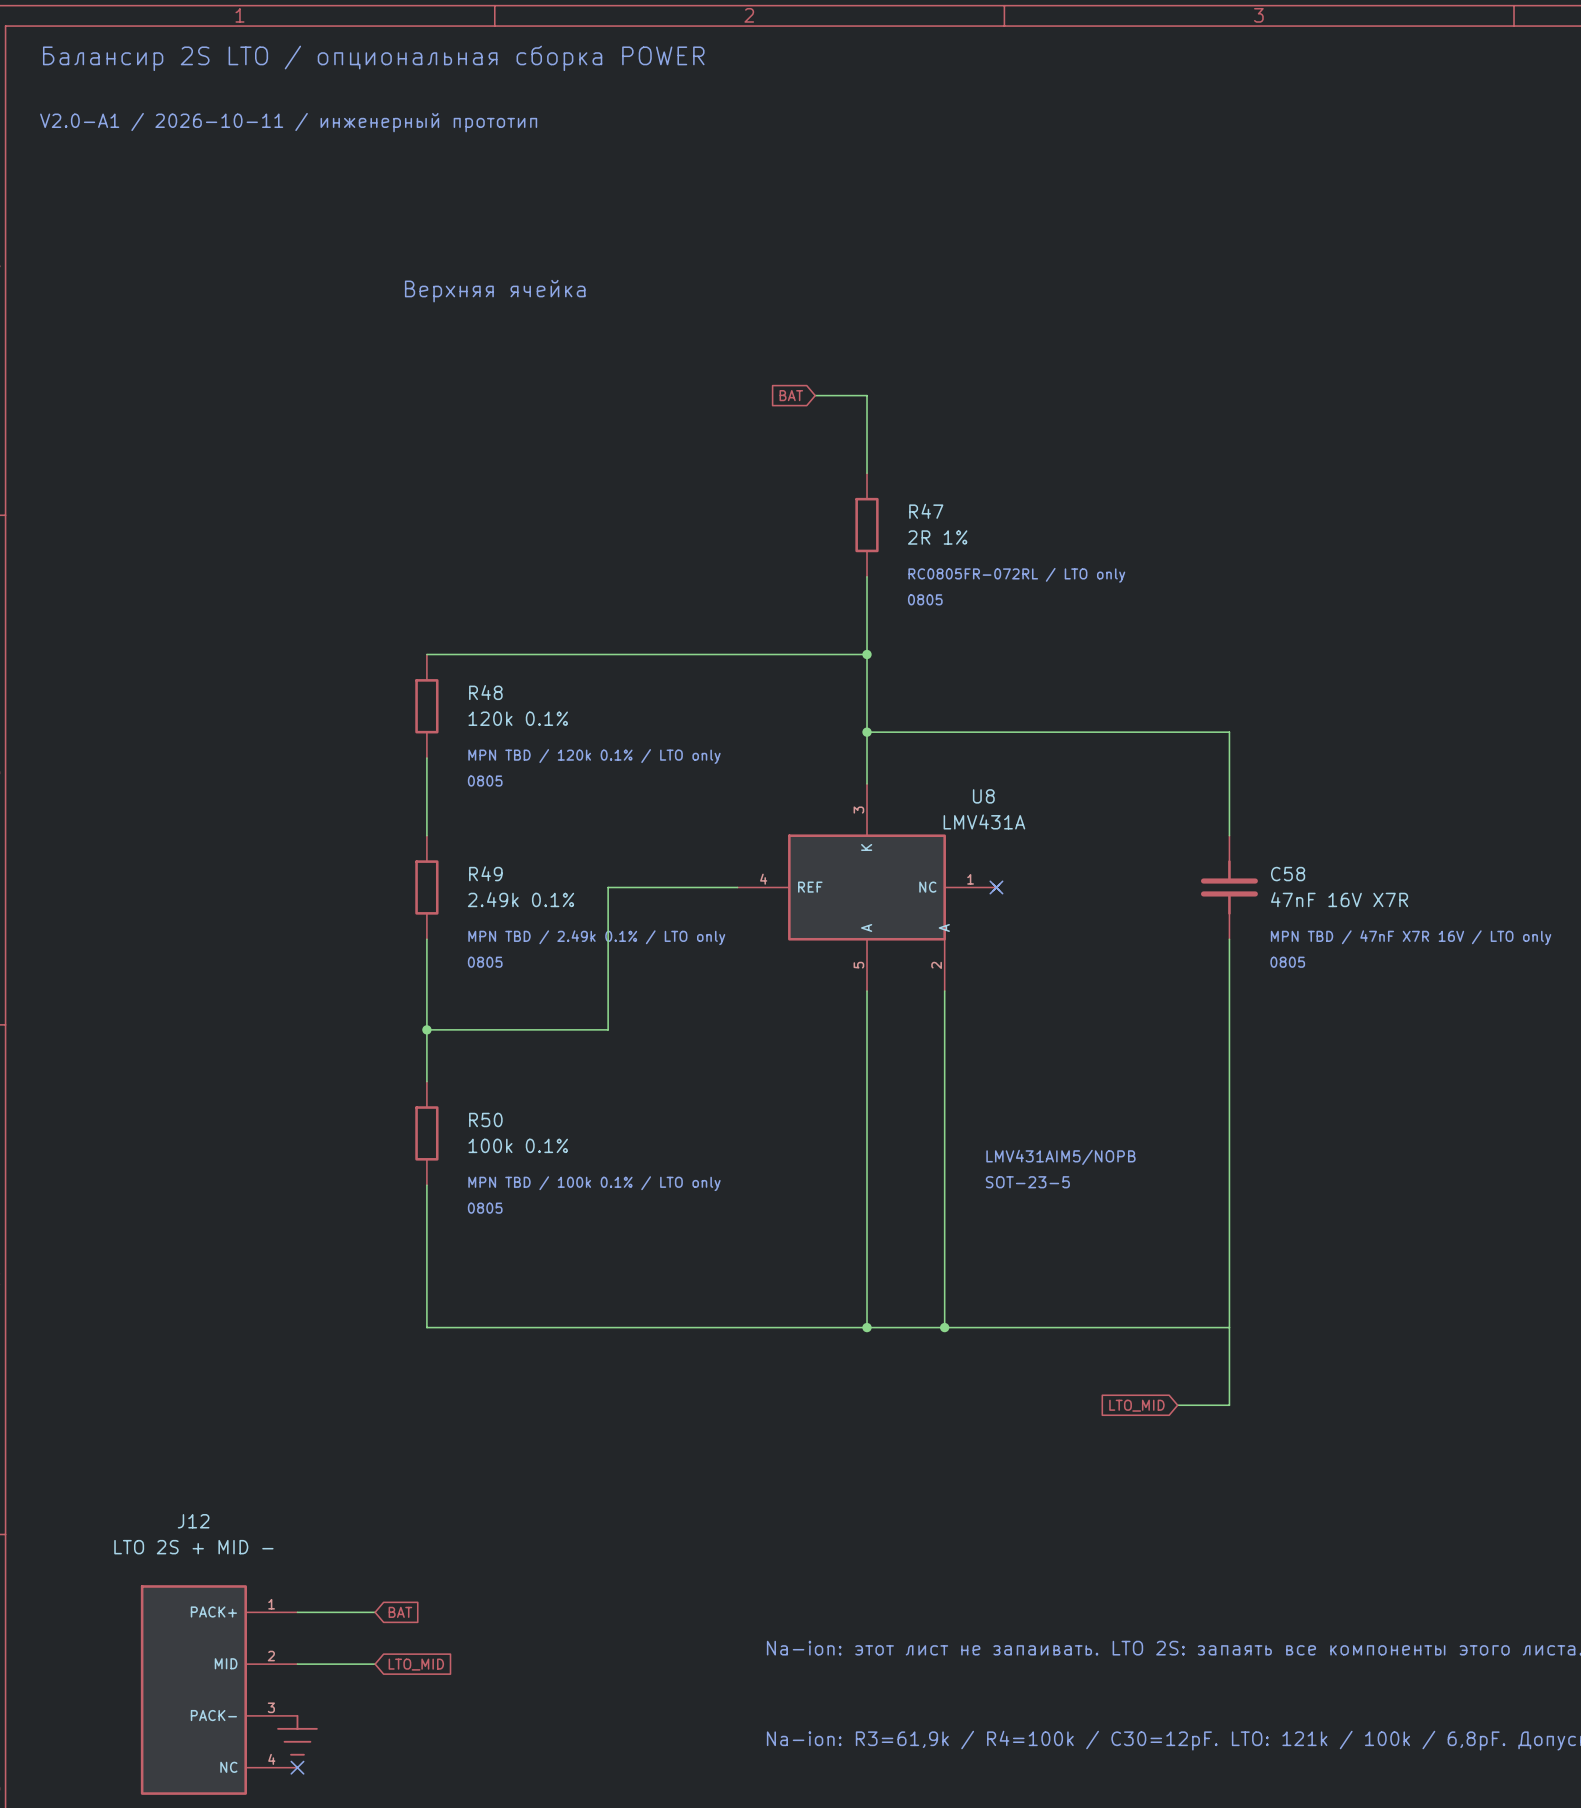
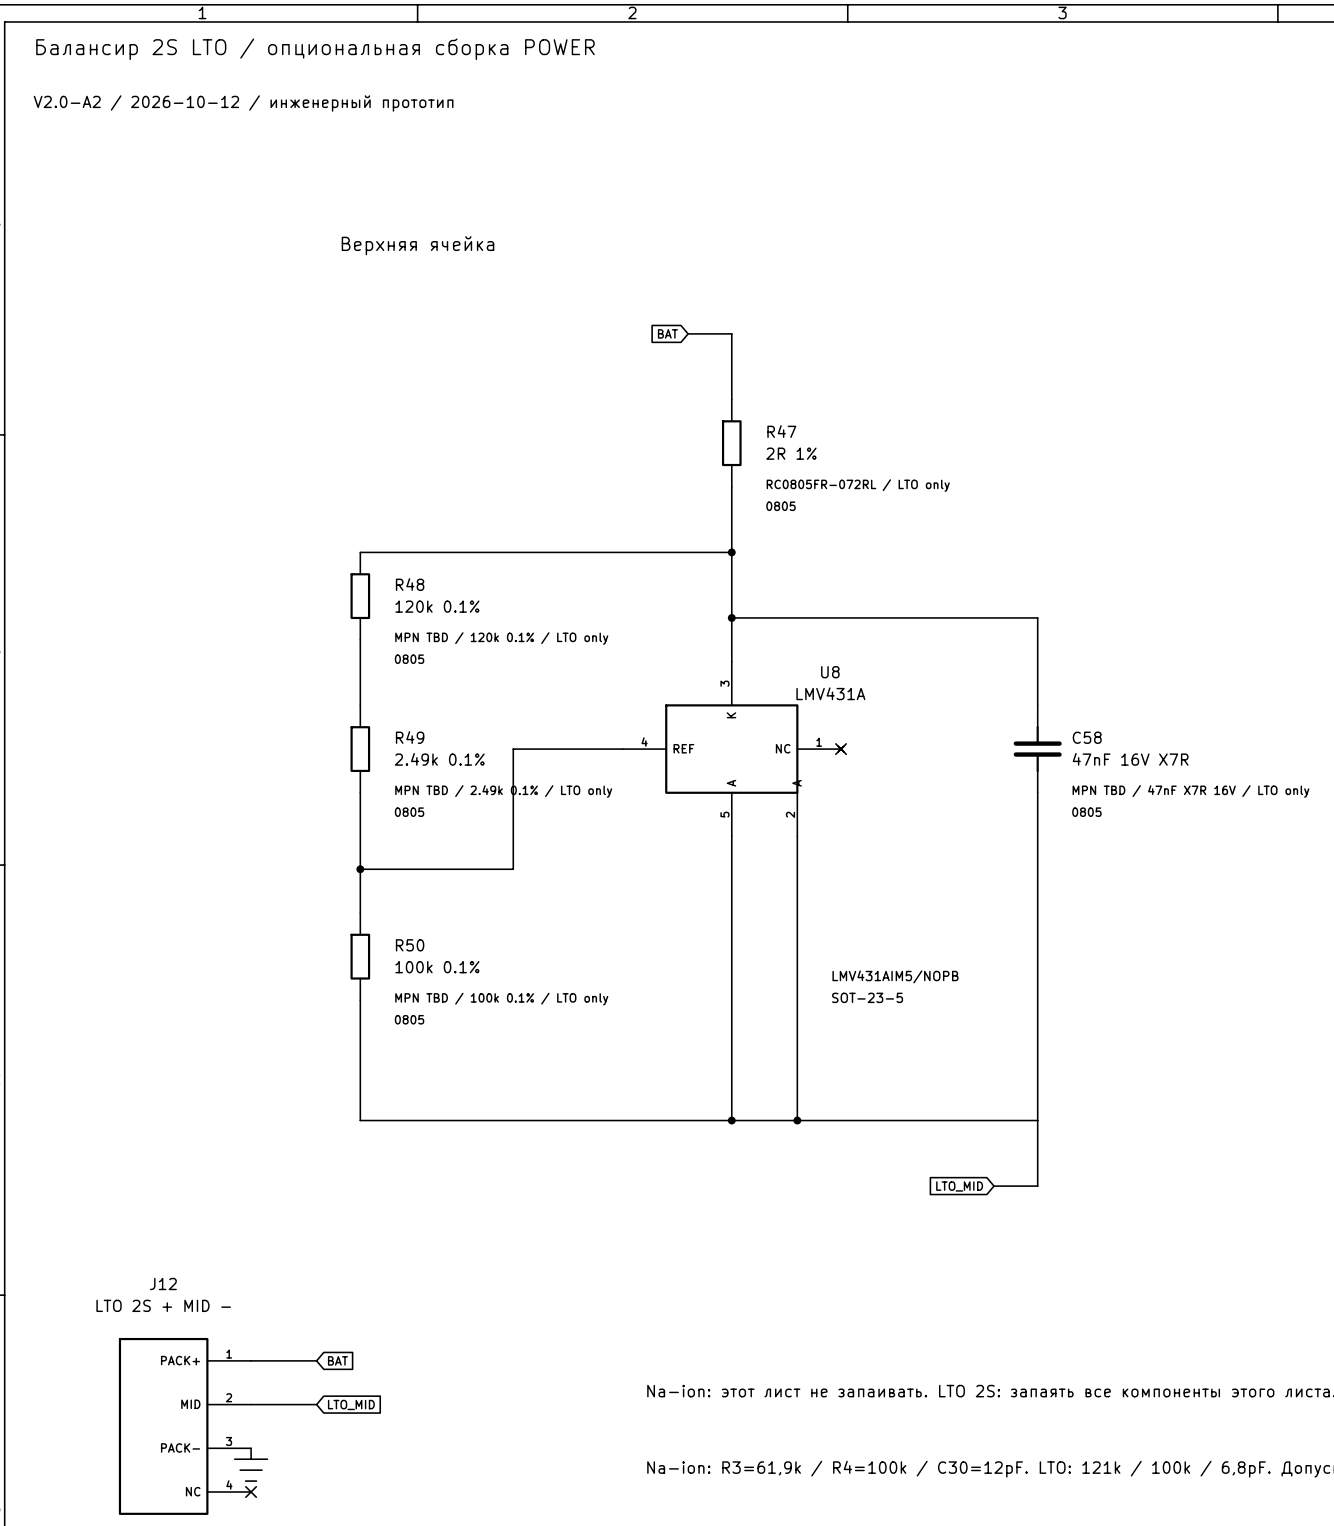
text: V2.0-A1 / 2026-10-11 / инженерный прототип (288, 122) -> V2.0-A2 / 2026-10-12 / инженерный прототип (243, 103)

